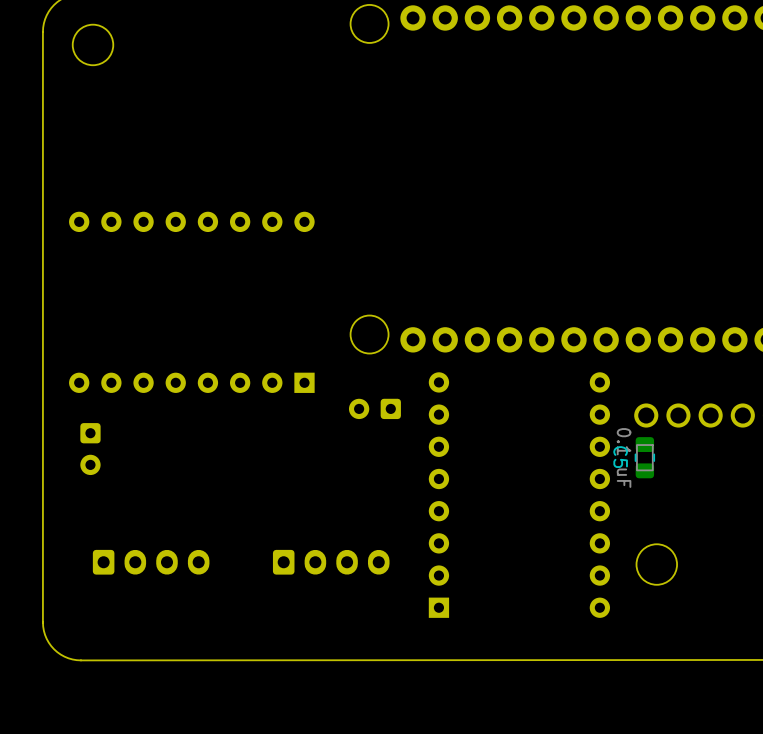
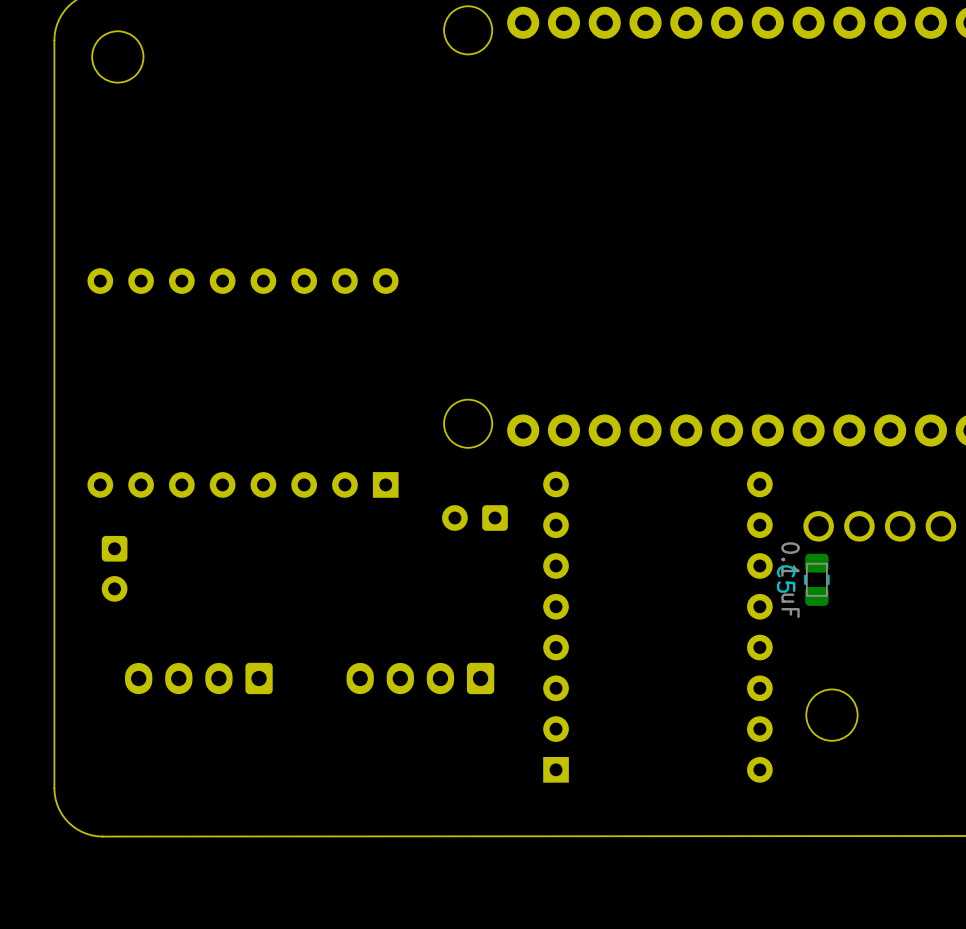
part rotation: 0° (151, 562) -> 180° (198, 678)
part rotation: 0° (331, 562) -> 180° (420, 678)

